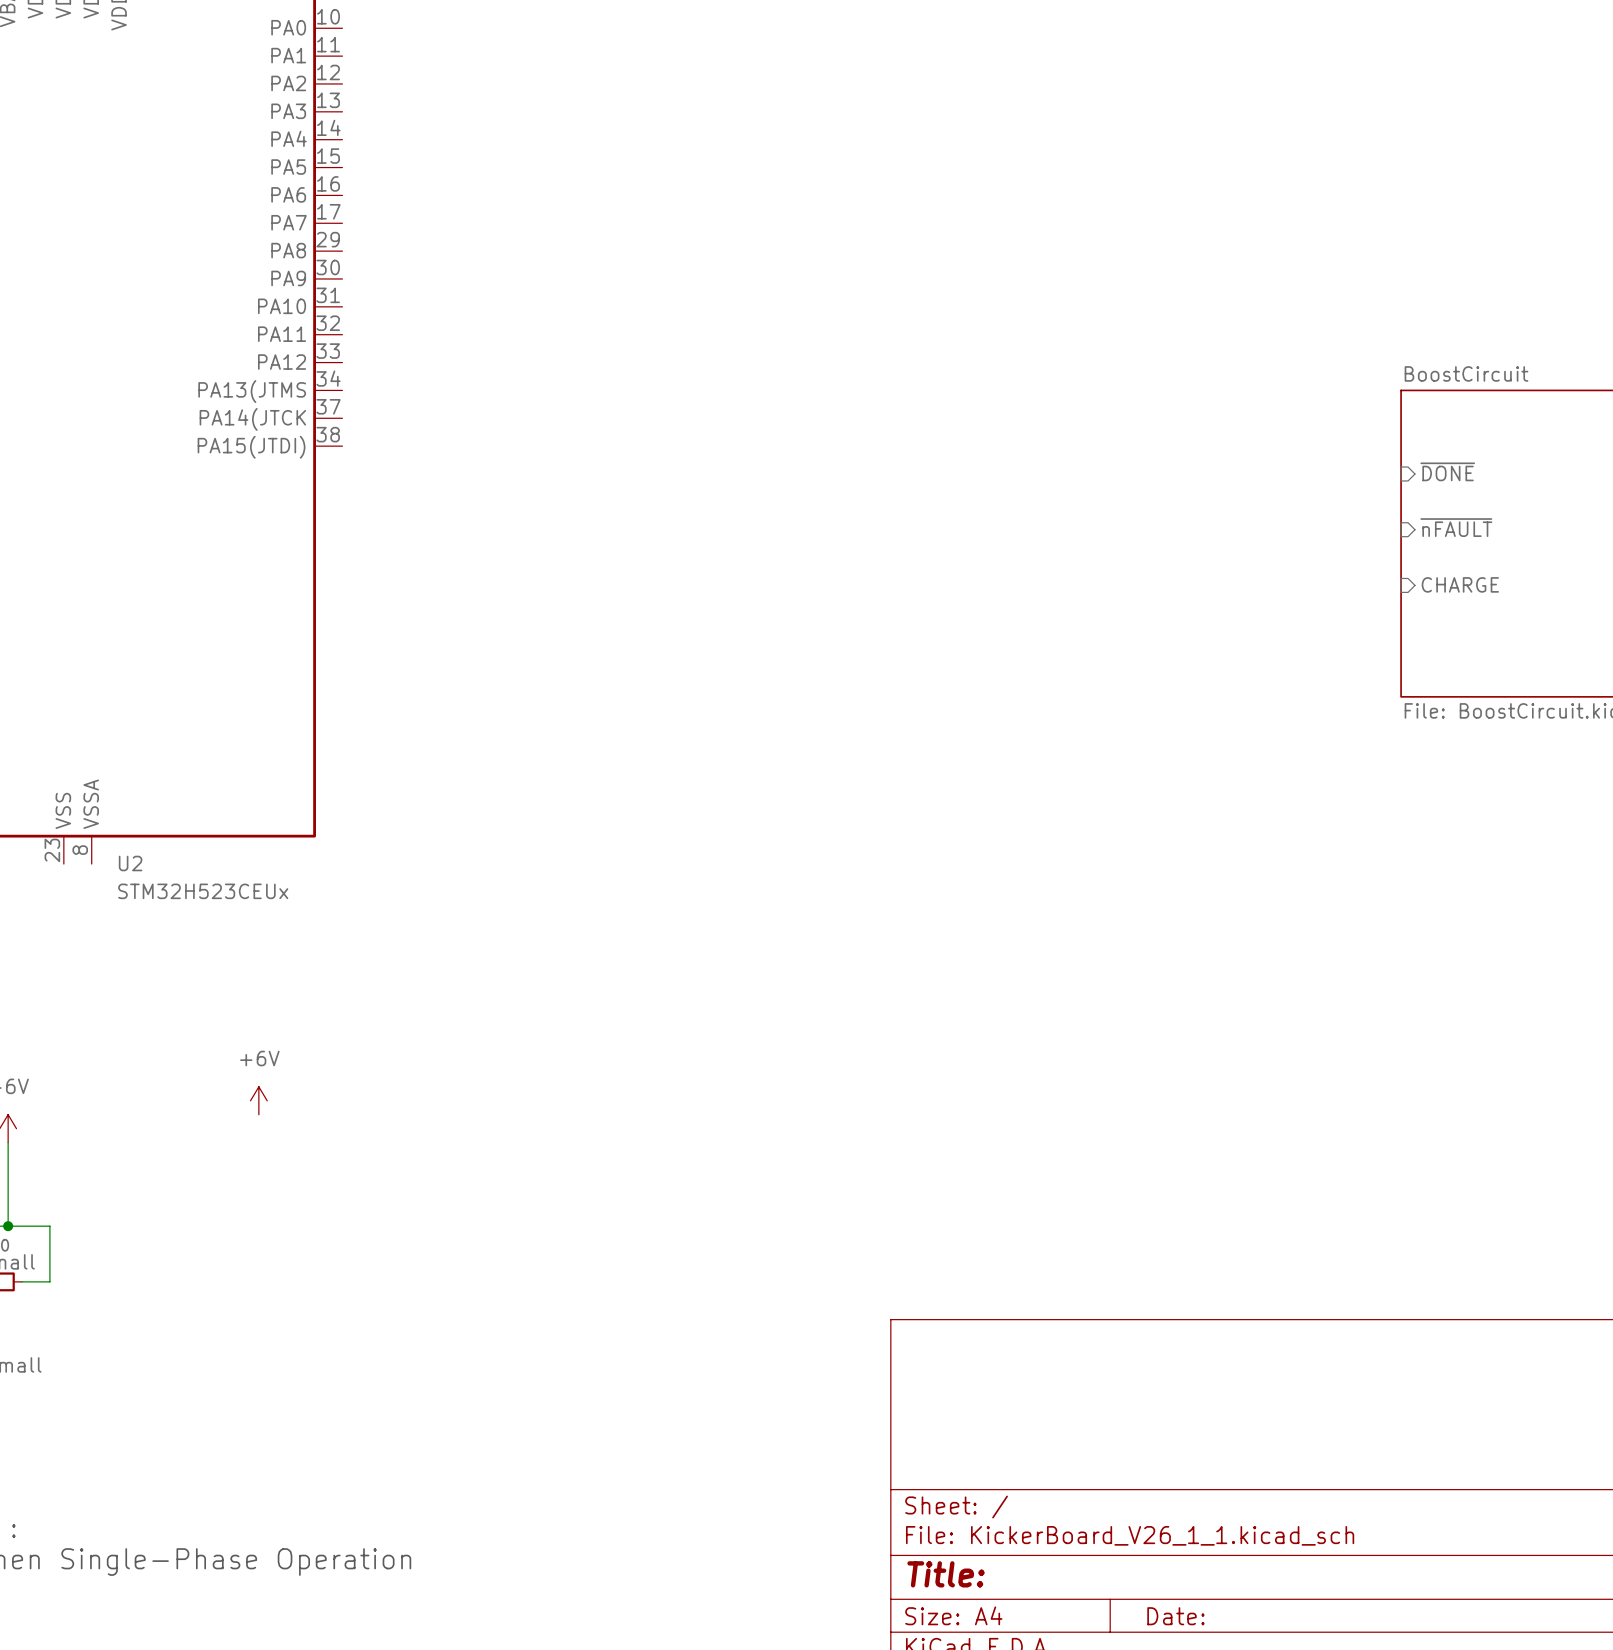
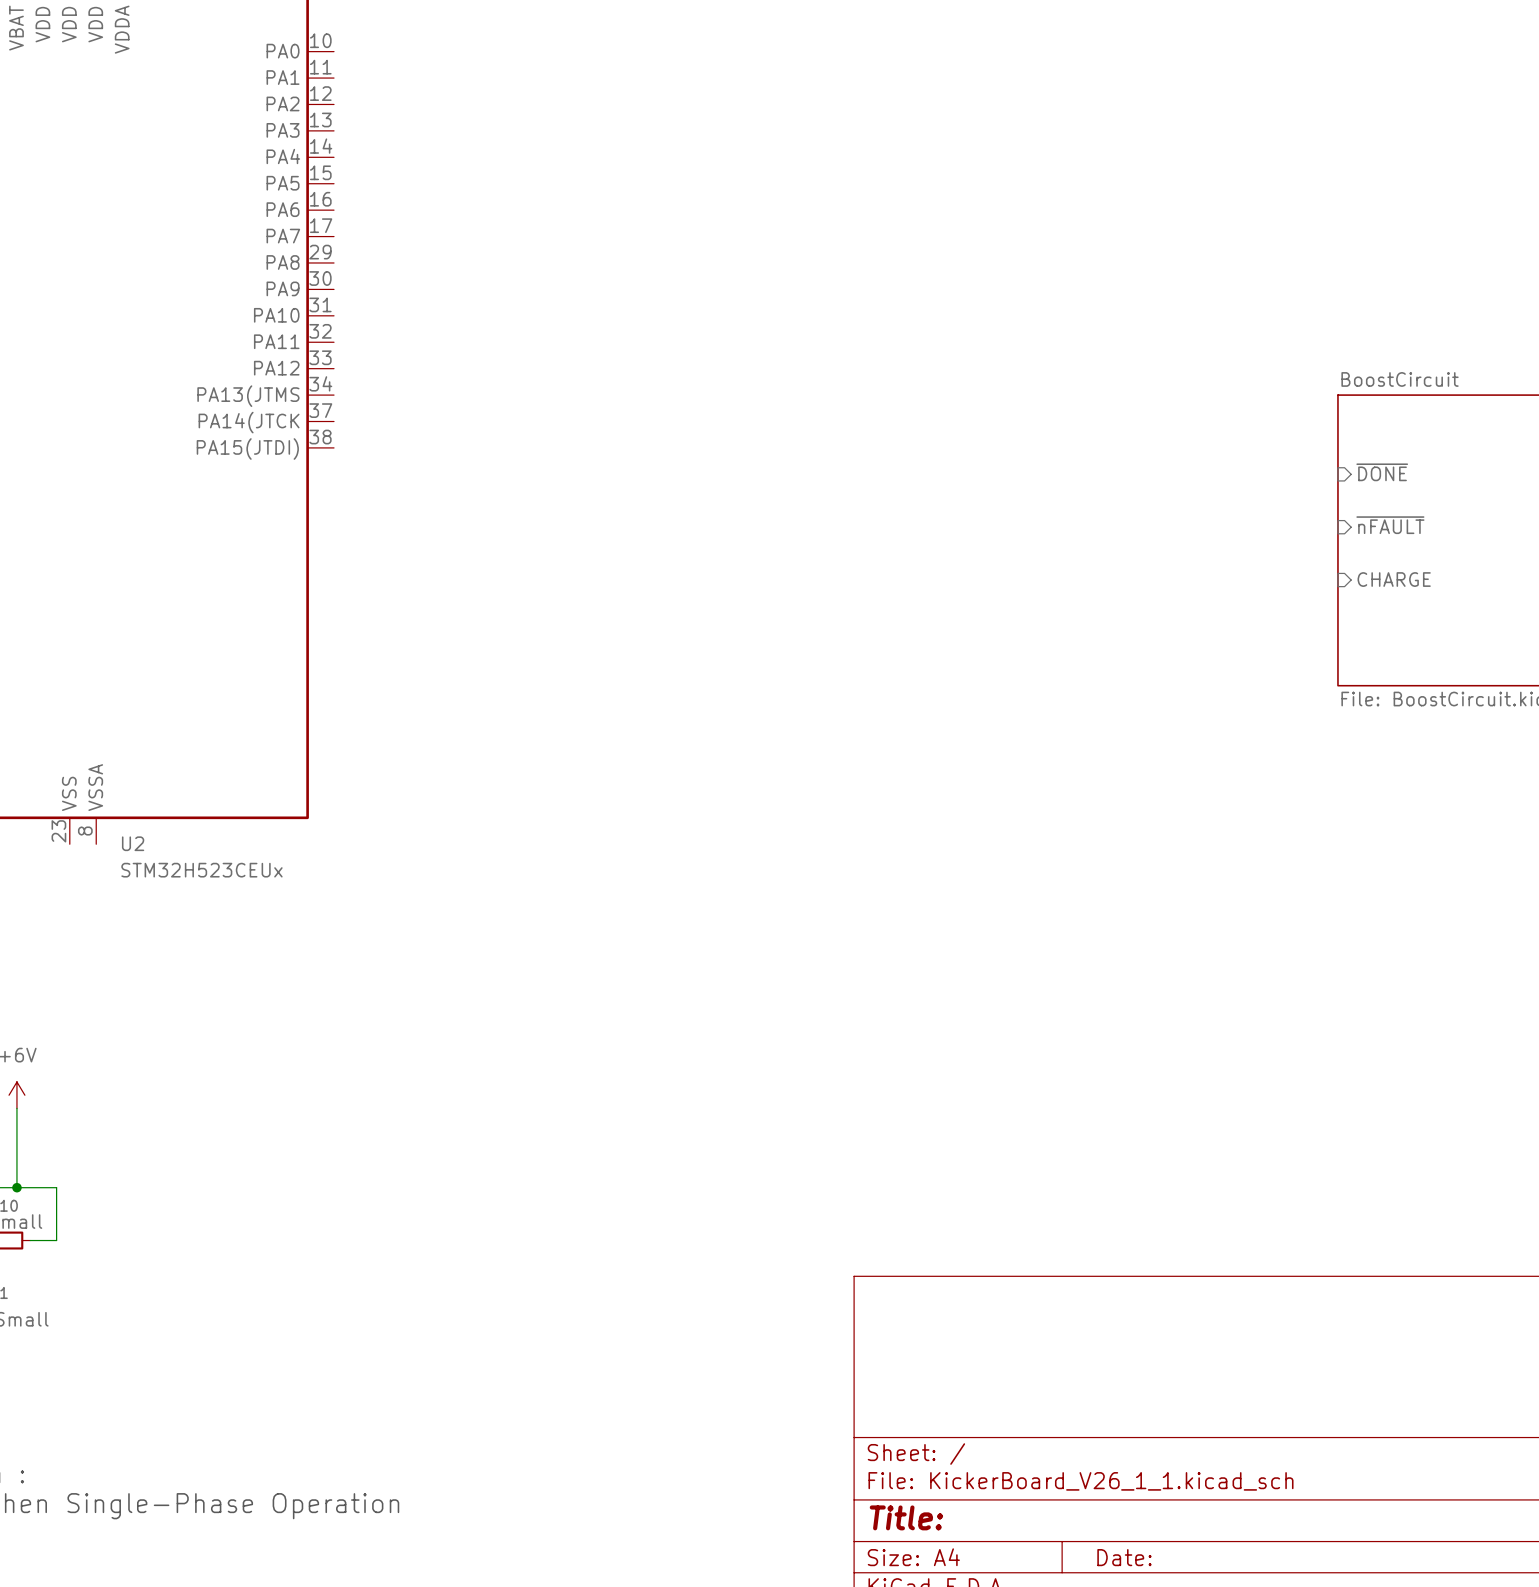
power symbol: +6V (258, 1100) -> none

